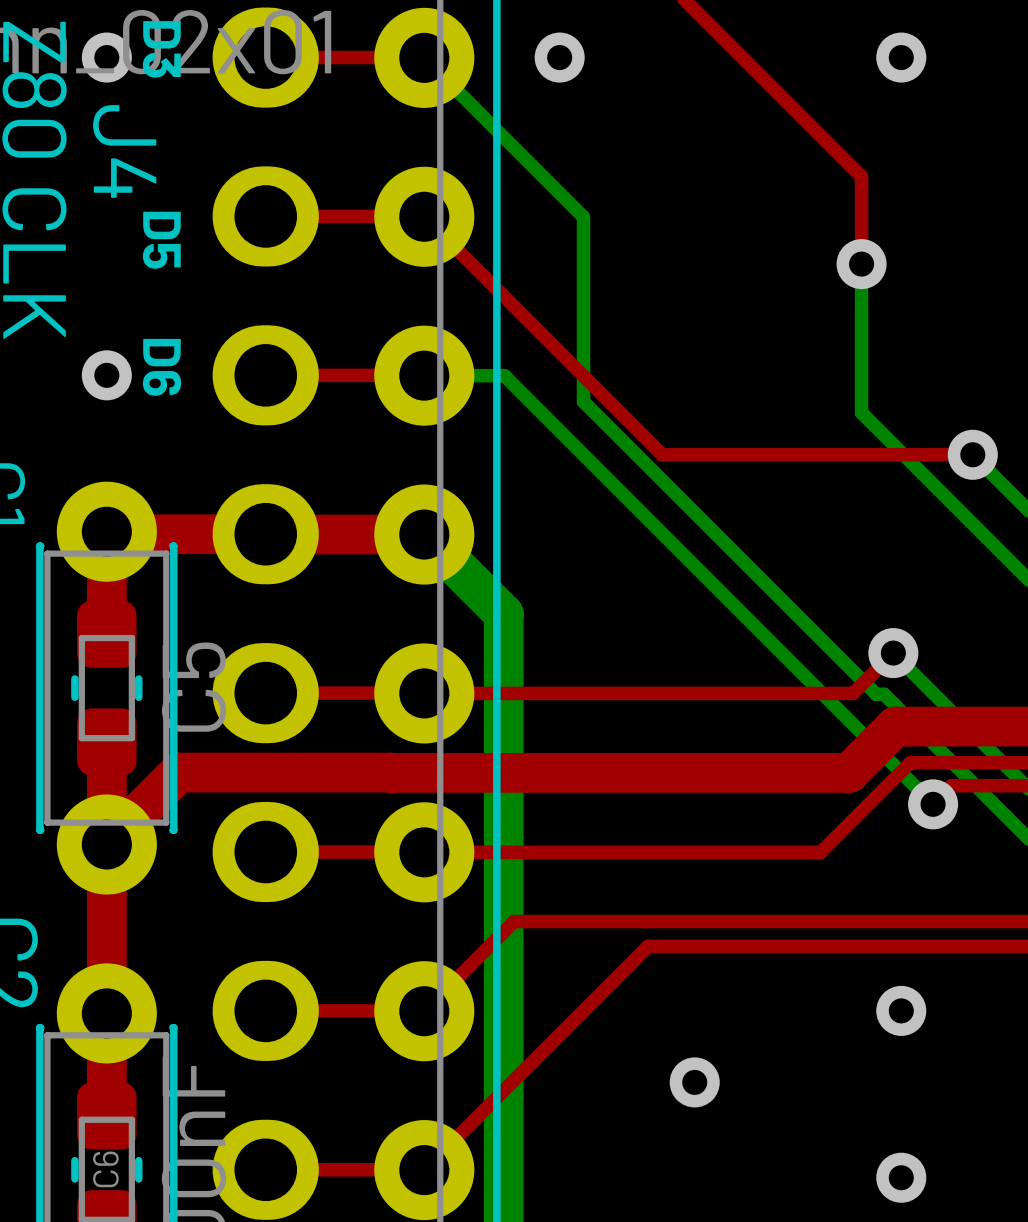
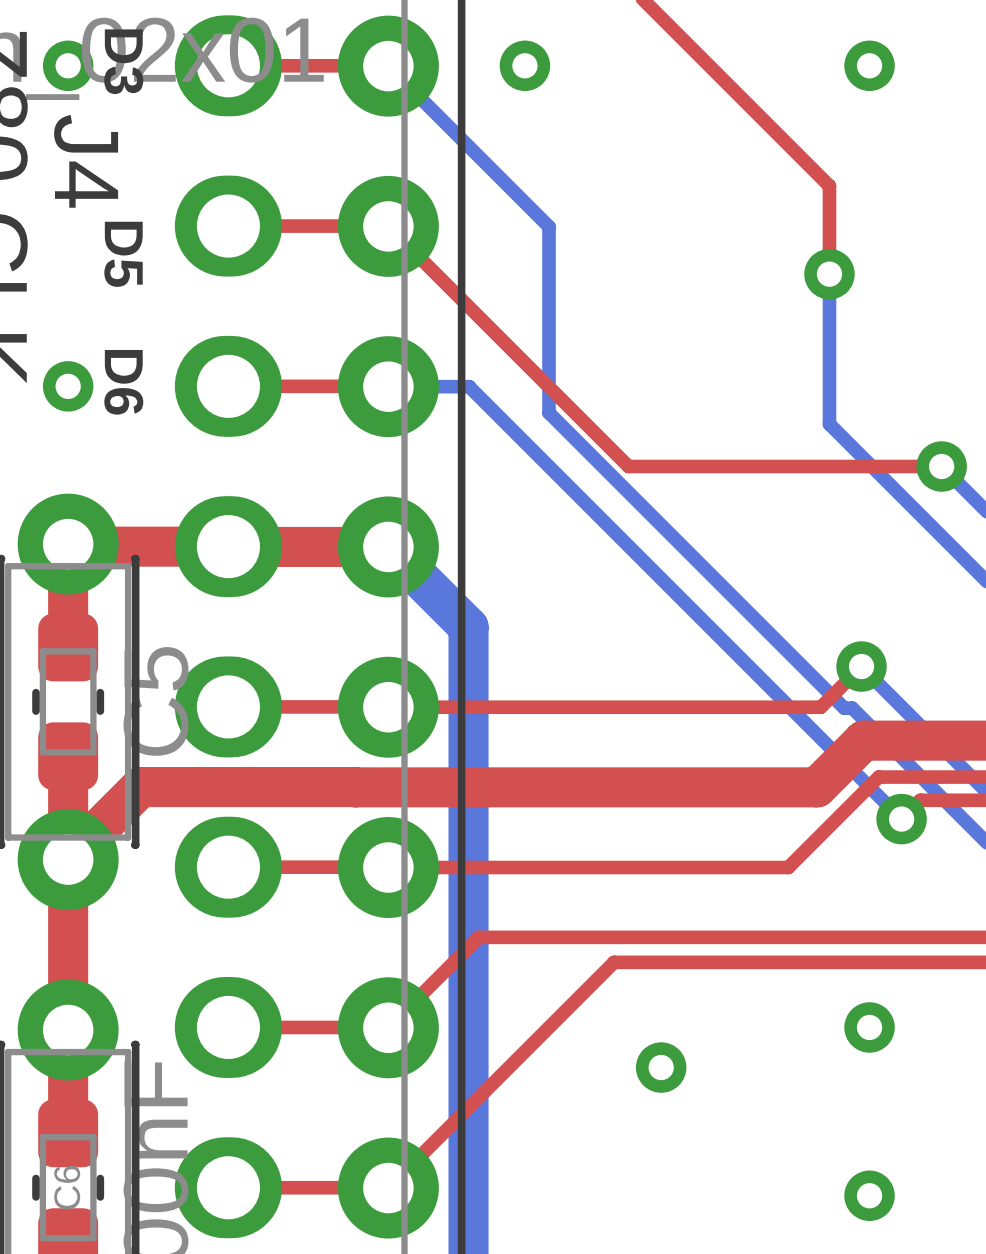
via position: (694, 1082) -> (661, 1067)

